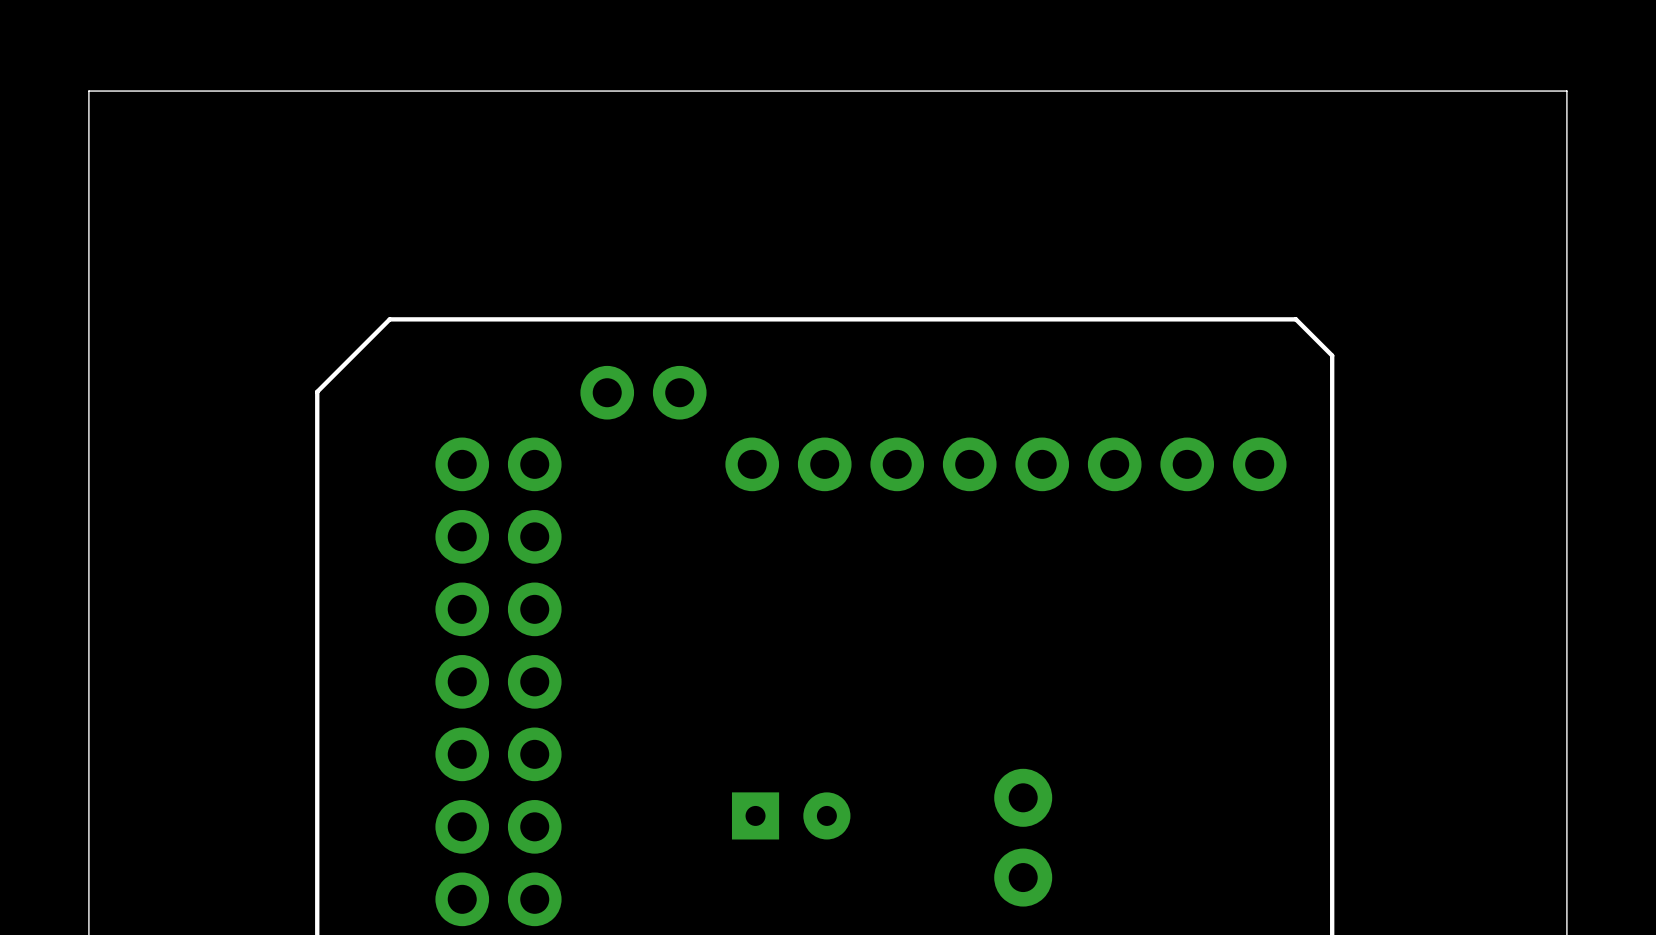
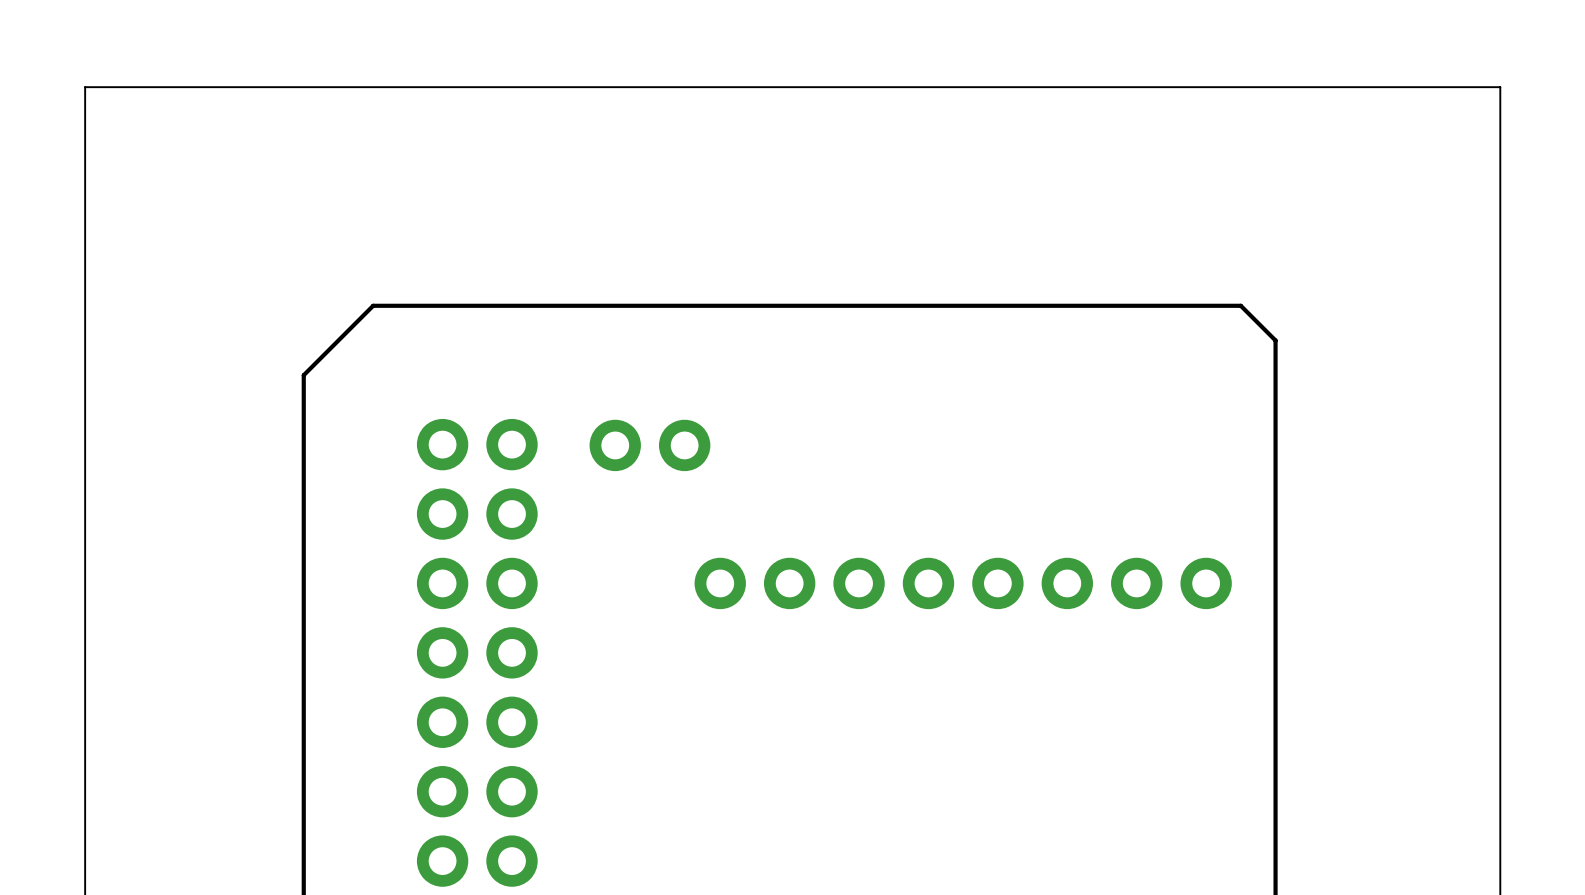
part position: (643, 392) -> (649, 445)
part position: (1005, 464) -> (963, 583)
part: (791, 815) -> none
part: (1023, 837) -> none

